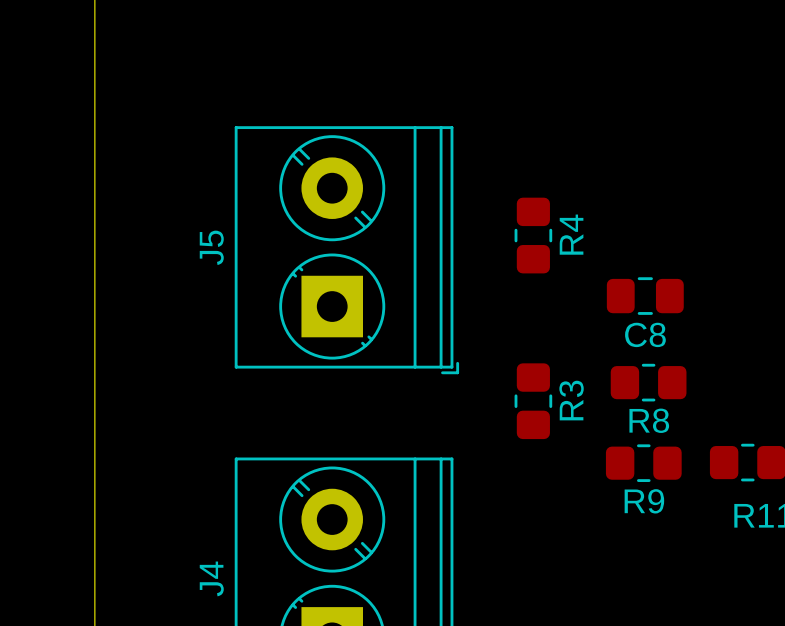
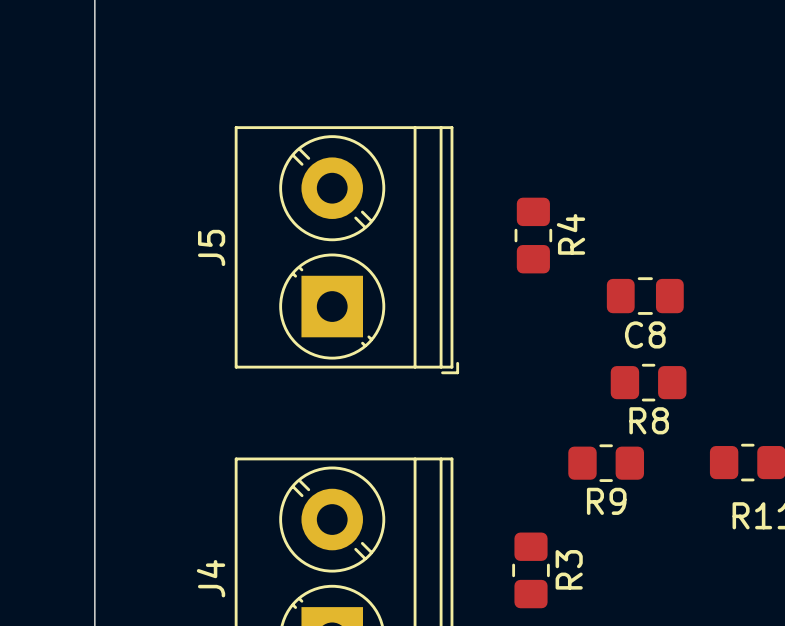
R3 position: (533, 401) -> (531, 570)
R9 position: (643, 463) -> (606, 463)

